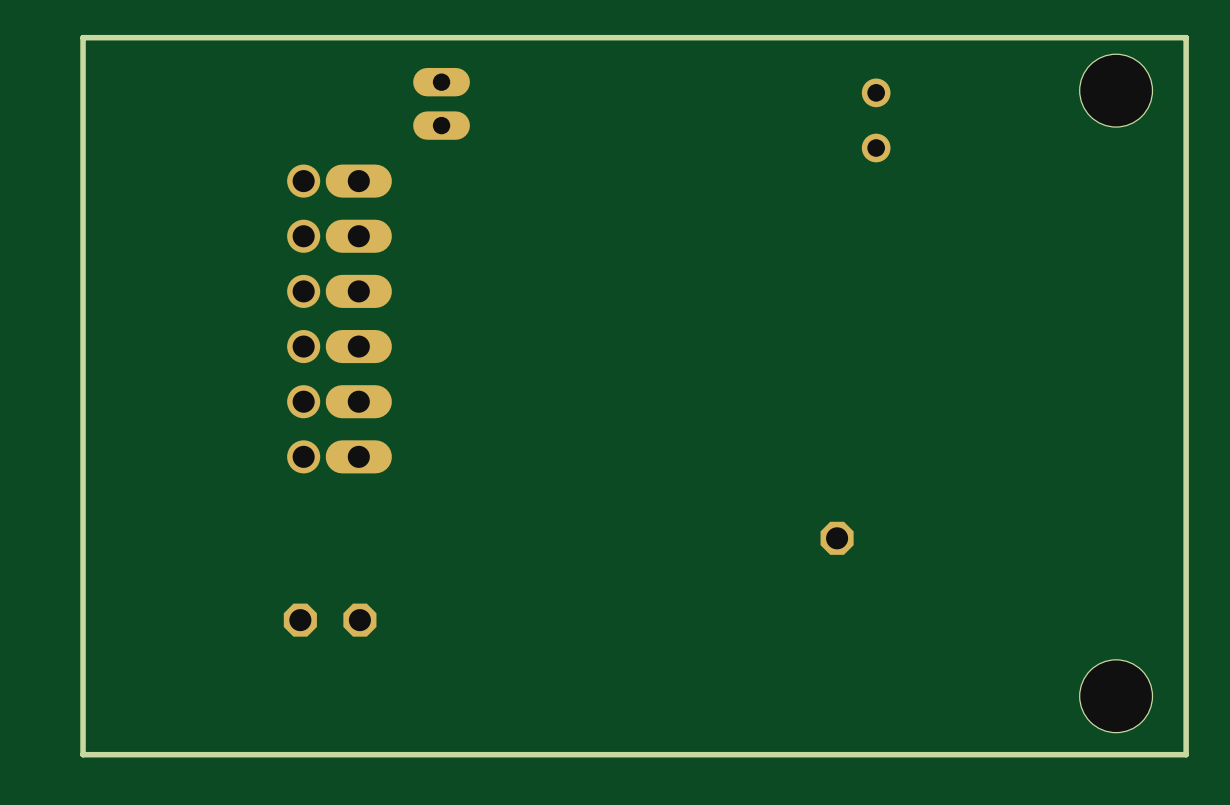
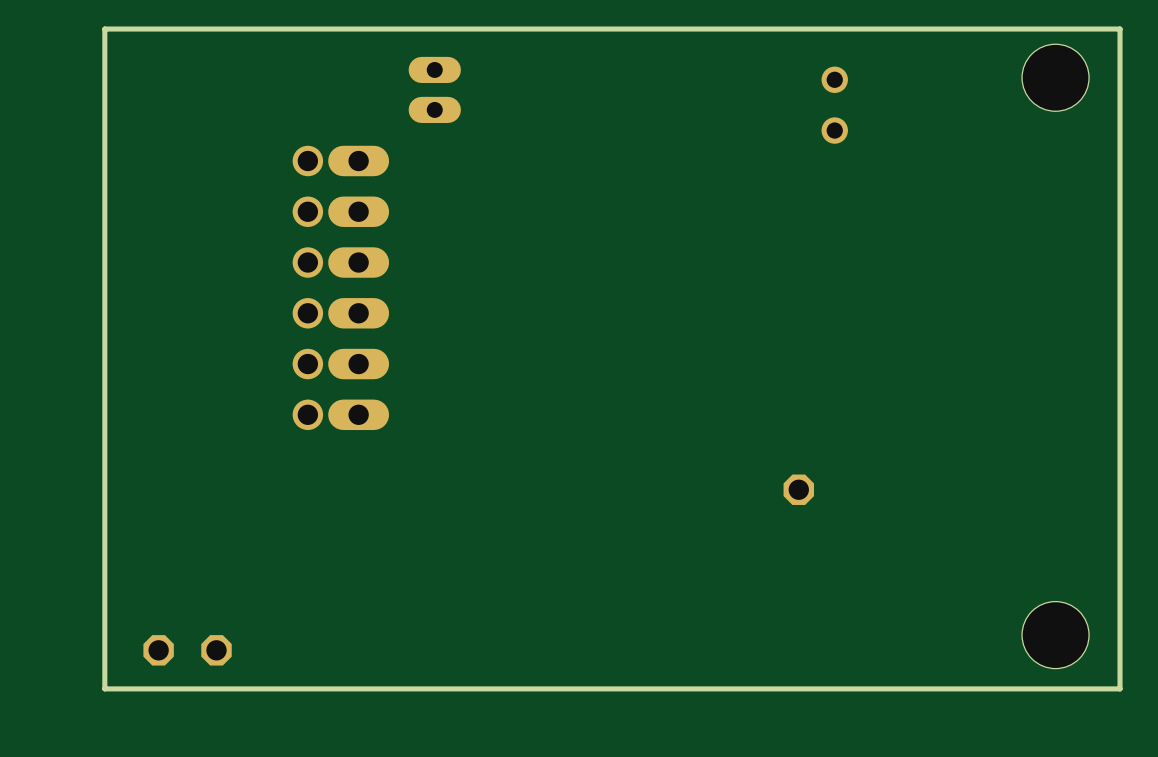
part: (300, 620) -> none
part: (359, 620) -> none
part: none -> (158, 650)
part: none -> (216, 650)

